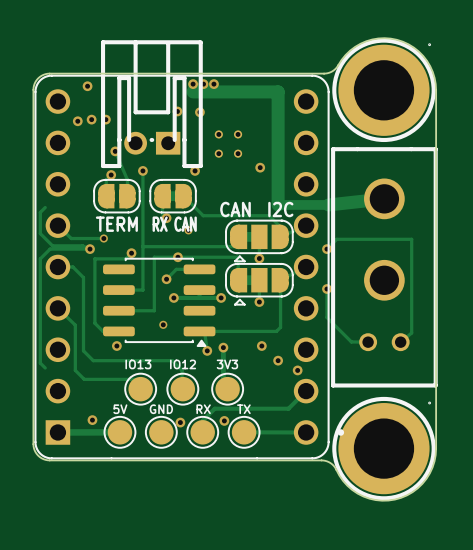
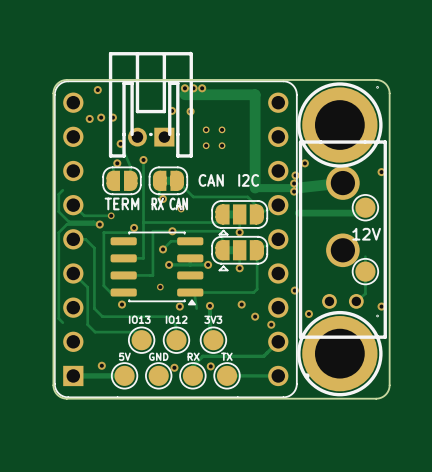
board edge: (338, 65) (332, 71) (324, 73) (49, 73) (43, 74) (36, 79) (33, 89) (33, 444) (34, 450) (39, 457) (49, 460) (323, 460) (333, 465) (343, 480) (352, 489) (363, 496) (382, 500) (394, 499) (407, 495) (417, 488) (426, 478) (432, 467) (436, 448) (434, 77) (427, 60) (418, 51) (408, 44) (390, 38) (378, 38) (360, 43) (350, 50) (338, 65) -> (66, 79) (57, 83) (53, 93) (53, 385) (57, 394) (66, 398) (376, 398) (385, 394) (389, 385) (389, 93) (385, 83) (376, 79) (66, 79)
part position: (383, 90) -> (339, 125)
via: (260, 167) -> none
via: (195, 170) -> none
via: none -> (304, 163)
via: none -> (381, 172)
via: none -> (295, 175)
via: none -> (294, 183)
text position: CAN (235, 209) -> CAN (211, 180)
text position: I2C (280, 209) -> I2C (248, 180)
via: none -> (294, 191)
track: none -> (365, 207) (360, 213) (298, 213)
part: none -> (365, 207)
track: (326, 249) (336, 239) (411, 239) (411, 288) -> none
via: (326, 249) -> none
text: none -> 12V (366, 234)
track: (326, 289) (326, 317) (351, 341) (368, 342) -> none
via: (326, 289) -> none
part: none -> (365, 271)
via: none -> (294, 290)
via: none -> (381, 306)
via position: (207, 350) -> (179, 306)
via: none -> (308, 313)
part position: (383, 448) -> (339, 353)

